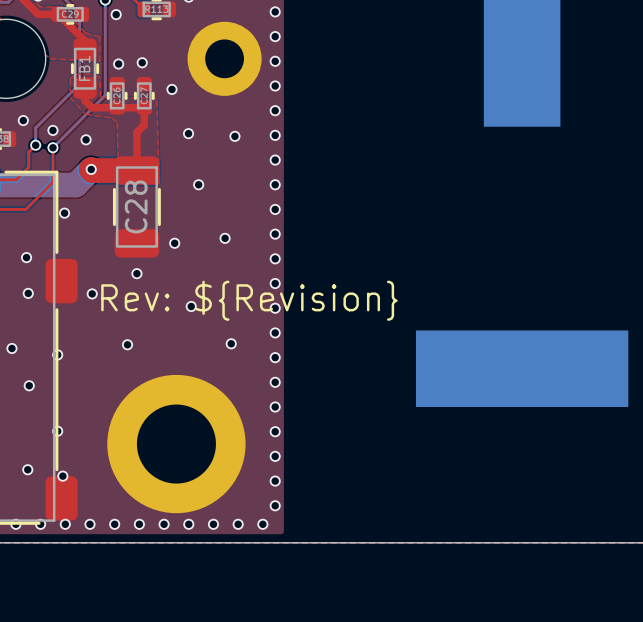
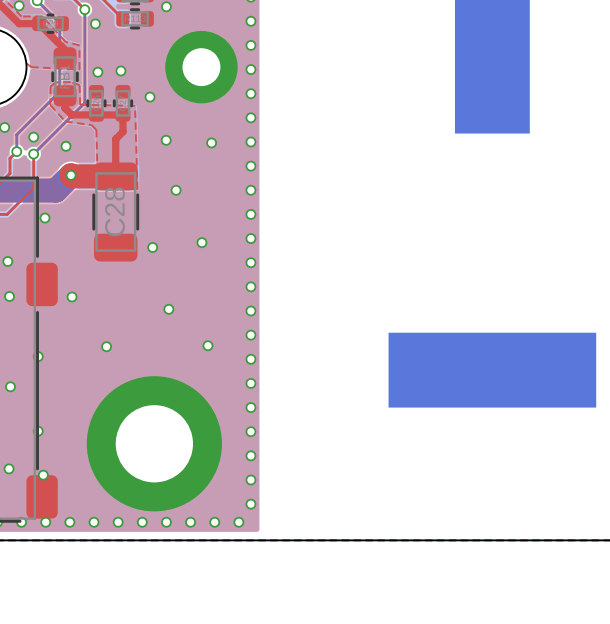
via: (136, 273) -> none
text: Rev: ${Revision} (249, 300) -> none

